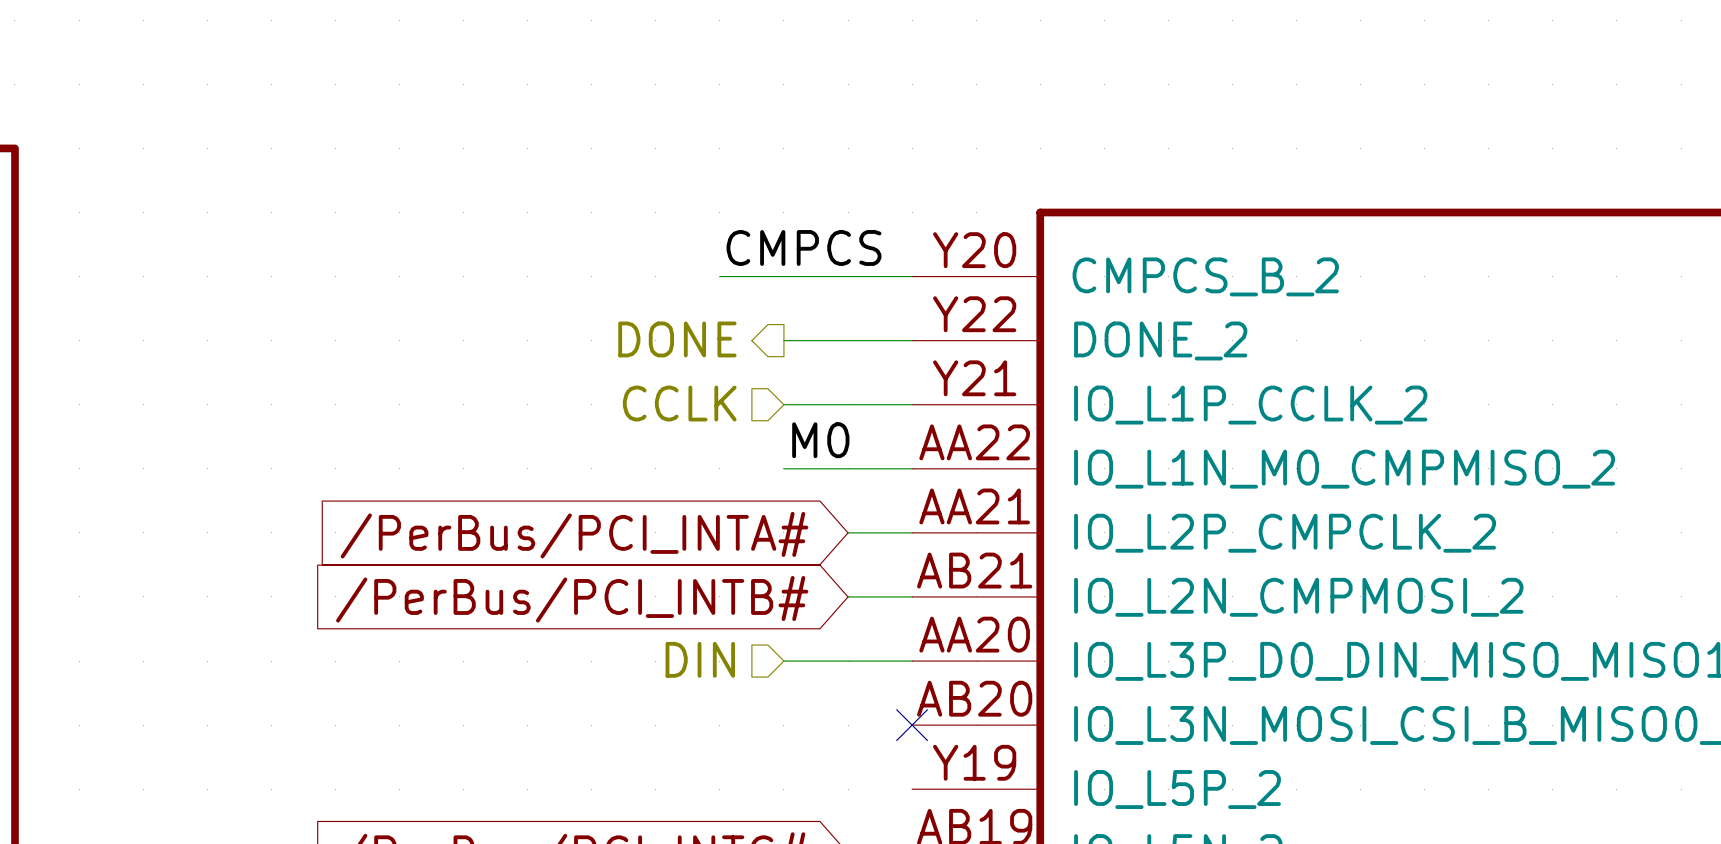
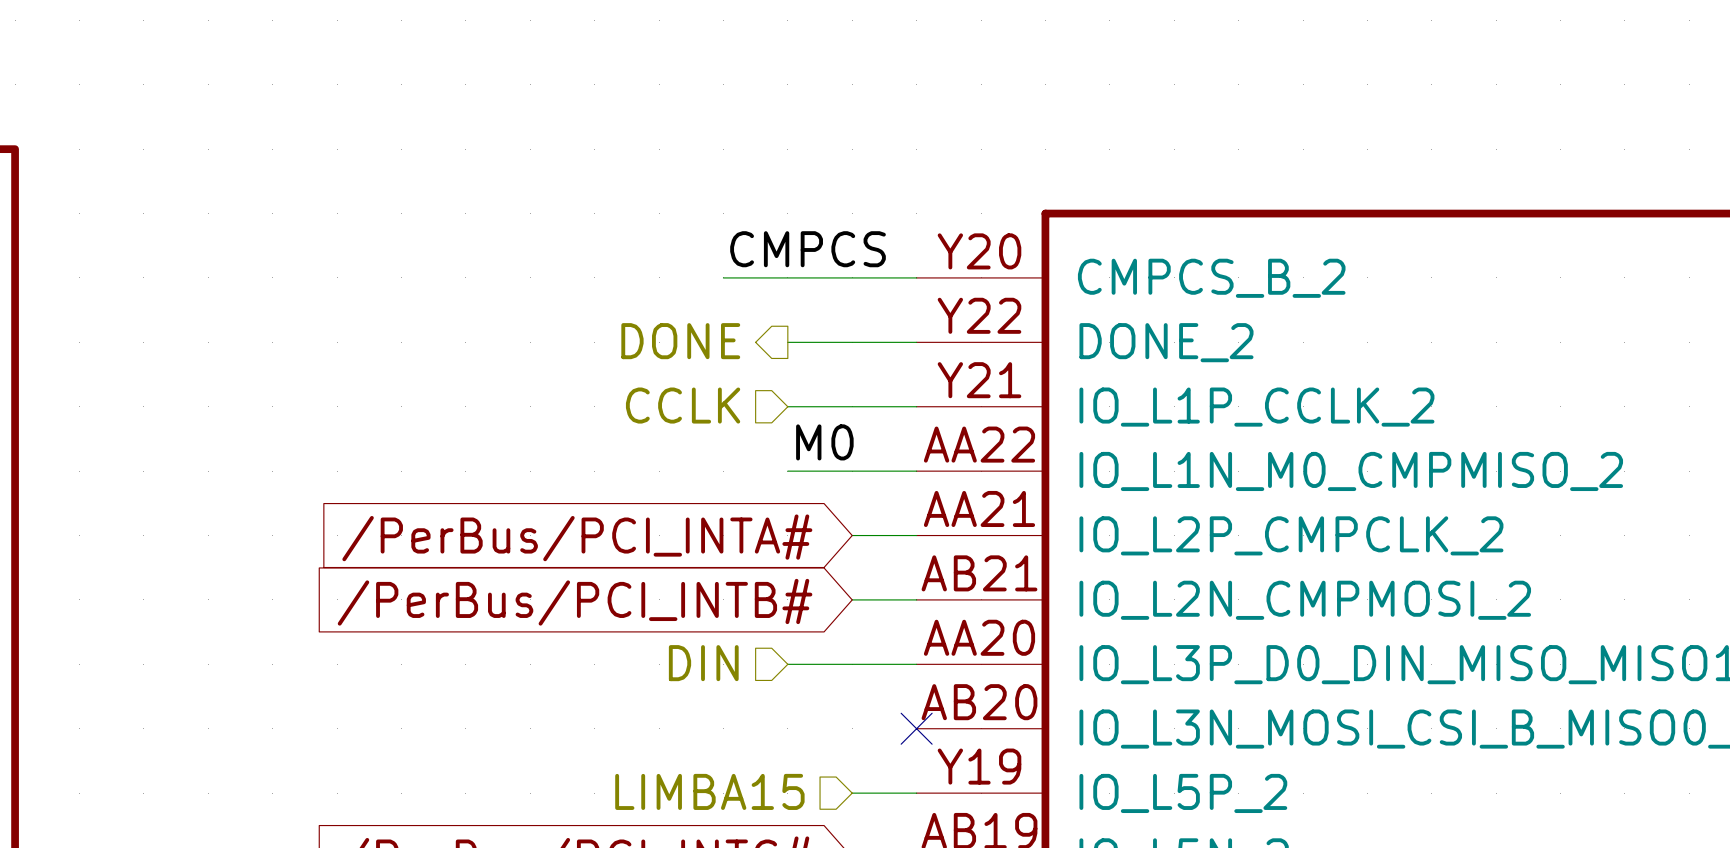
hierarchical label: none -> LIMBA15 (709, 791)
wire: none -> (852, 793) (916, 793)

